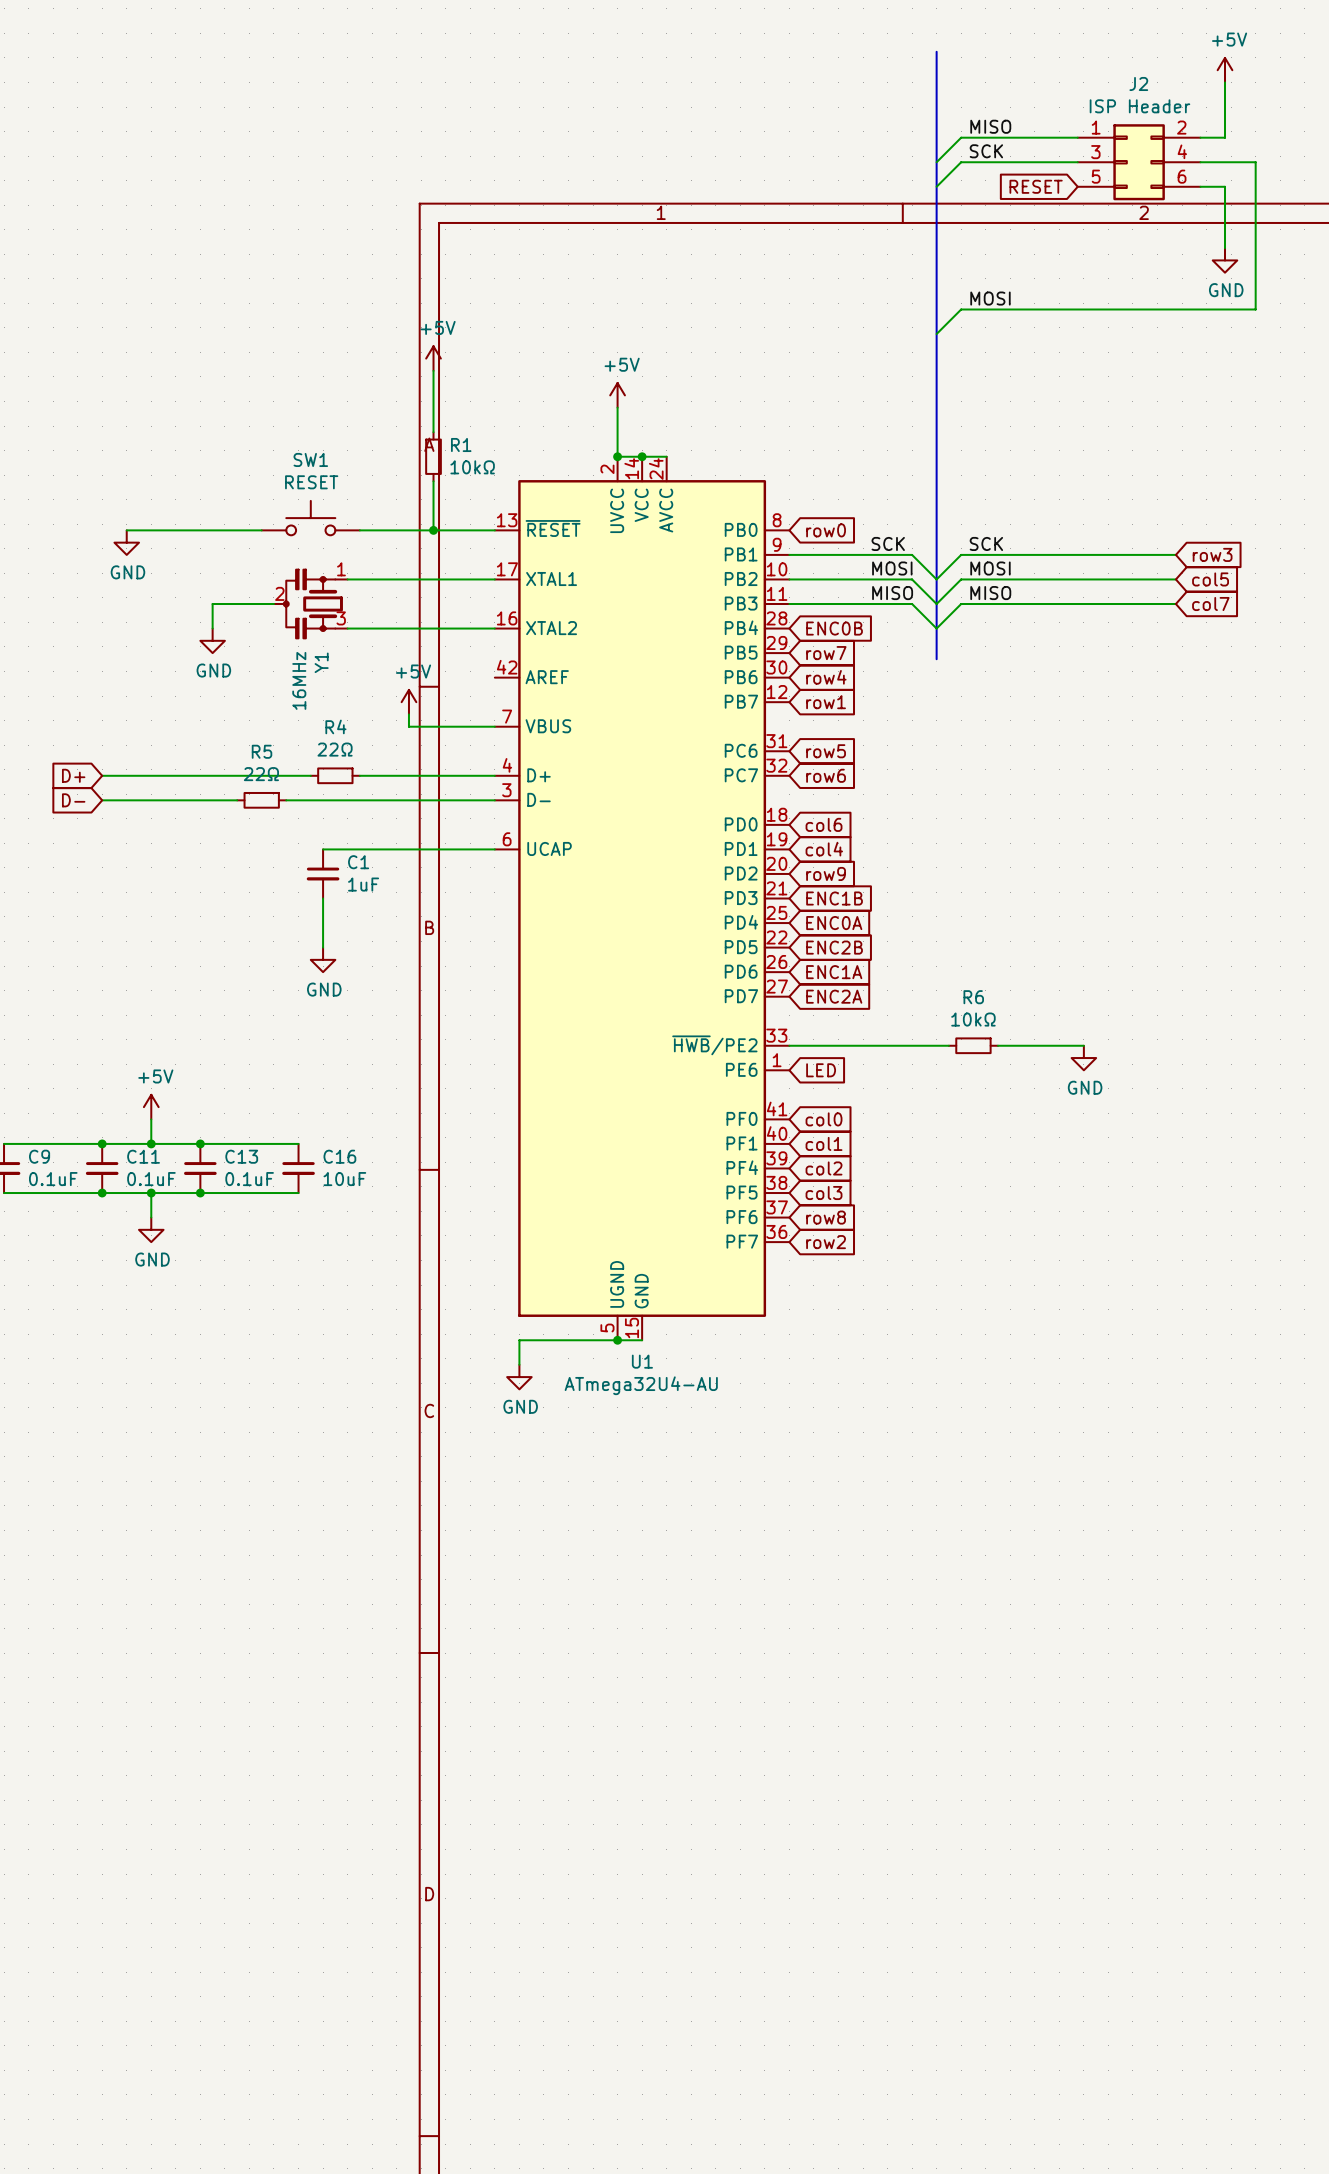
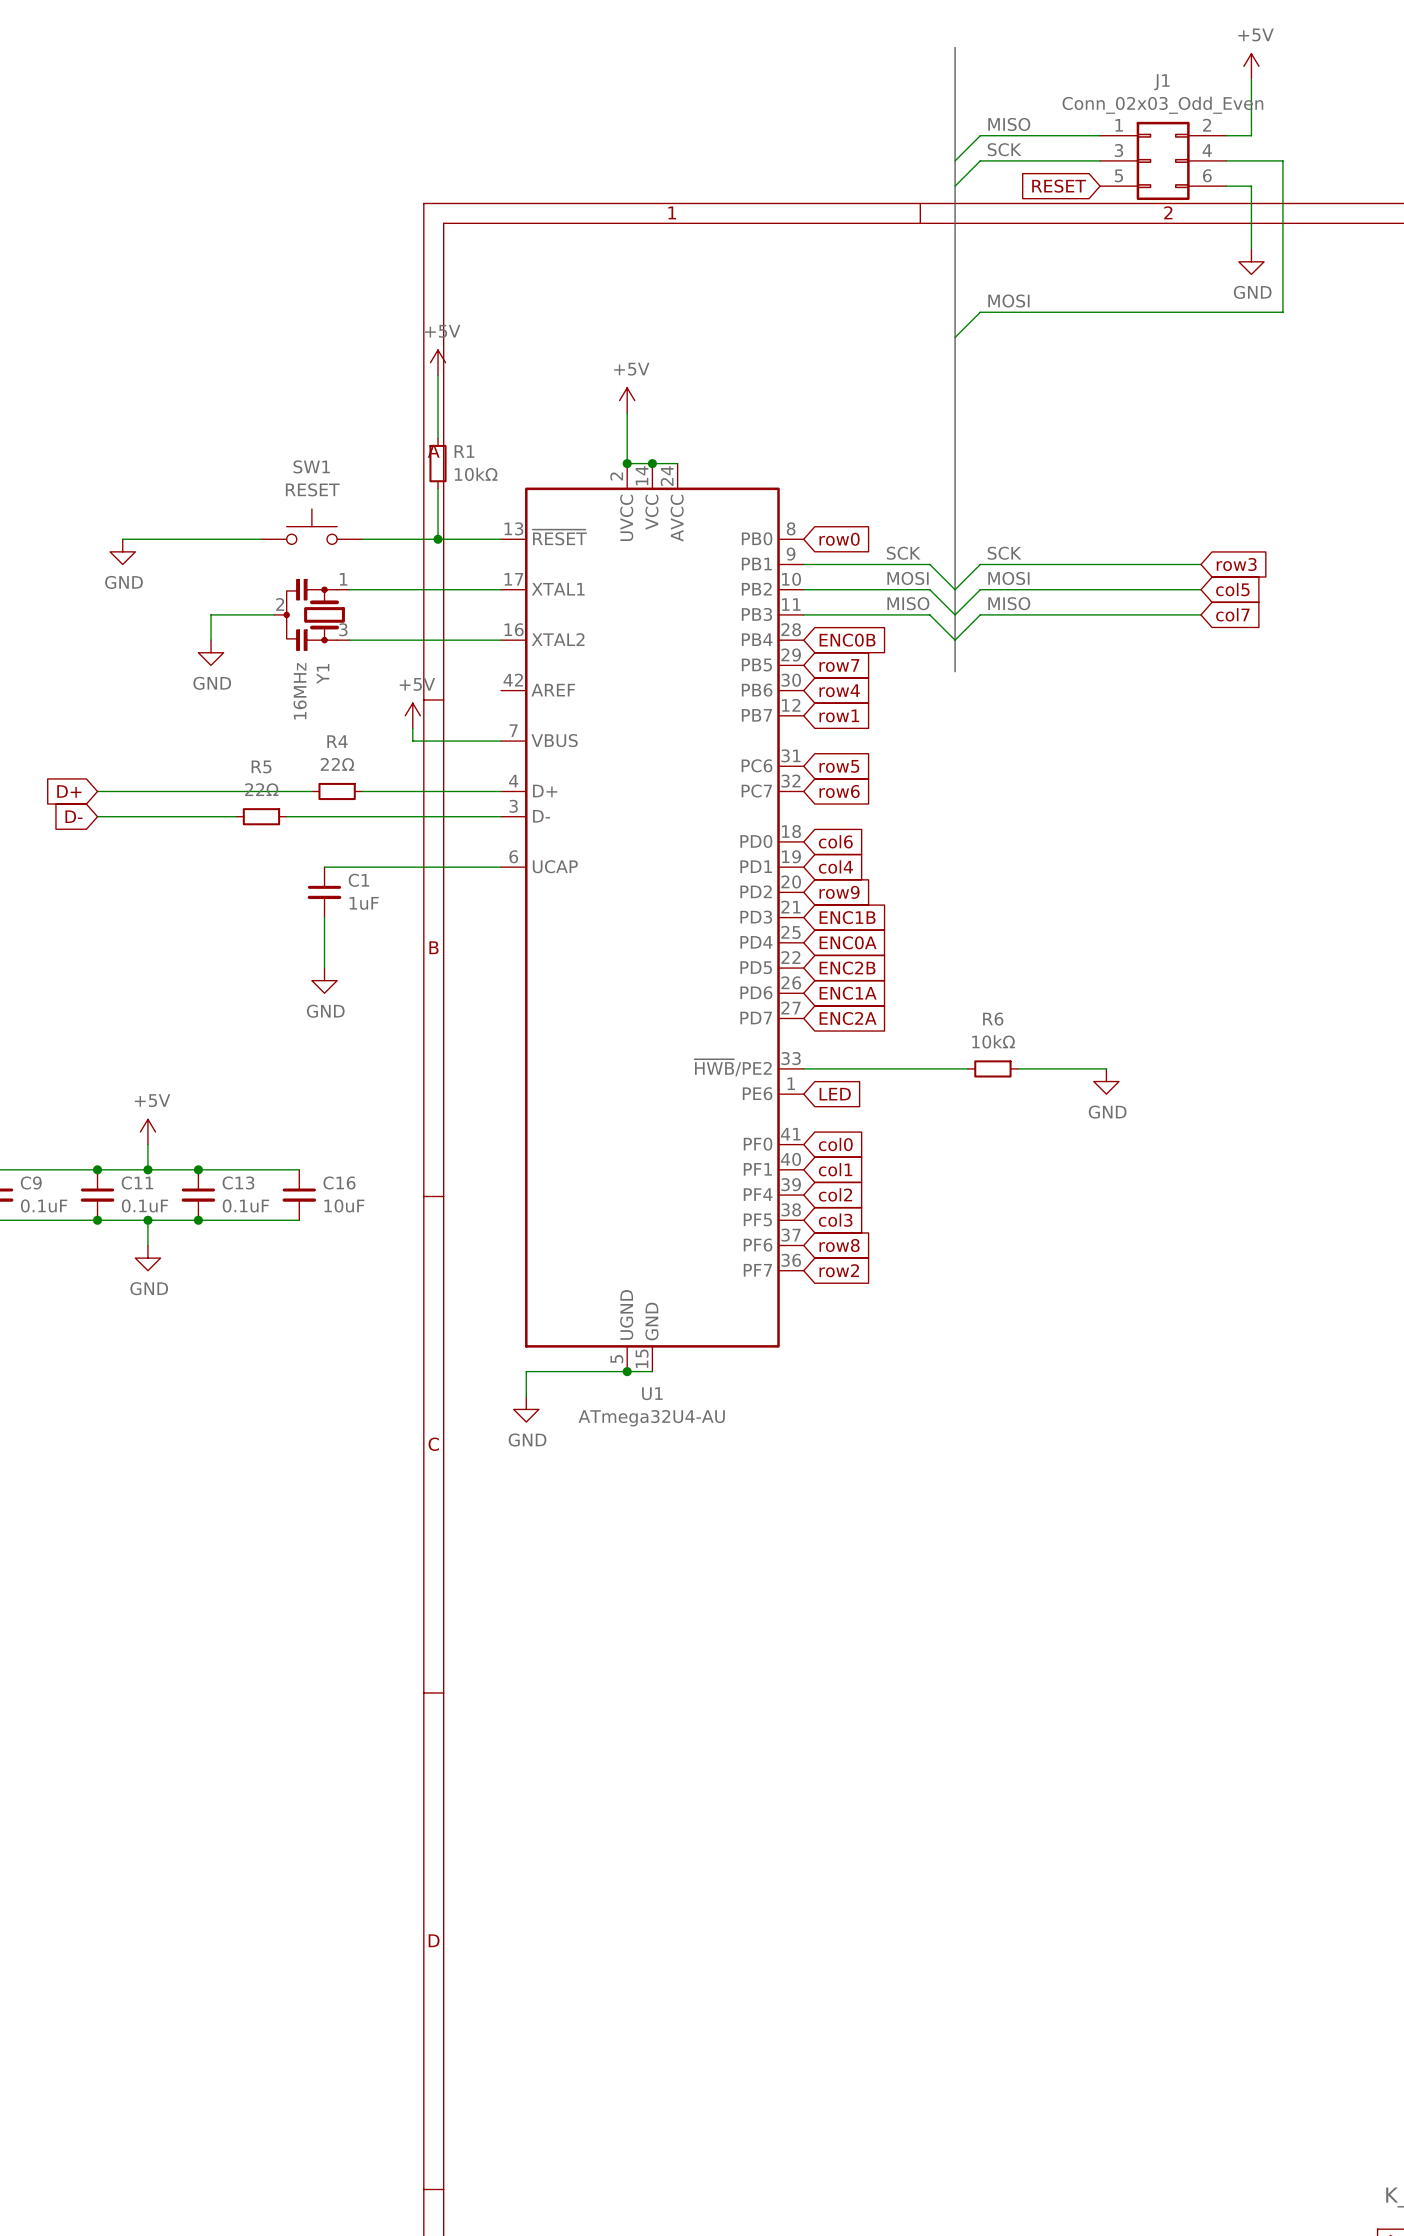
J2 name: J2 (1138, 83) -> J1 (1161, 82)
J2 value: ISP Header (1139, 106) -> Conn_02x03_Odd_Even (1162, 105)

